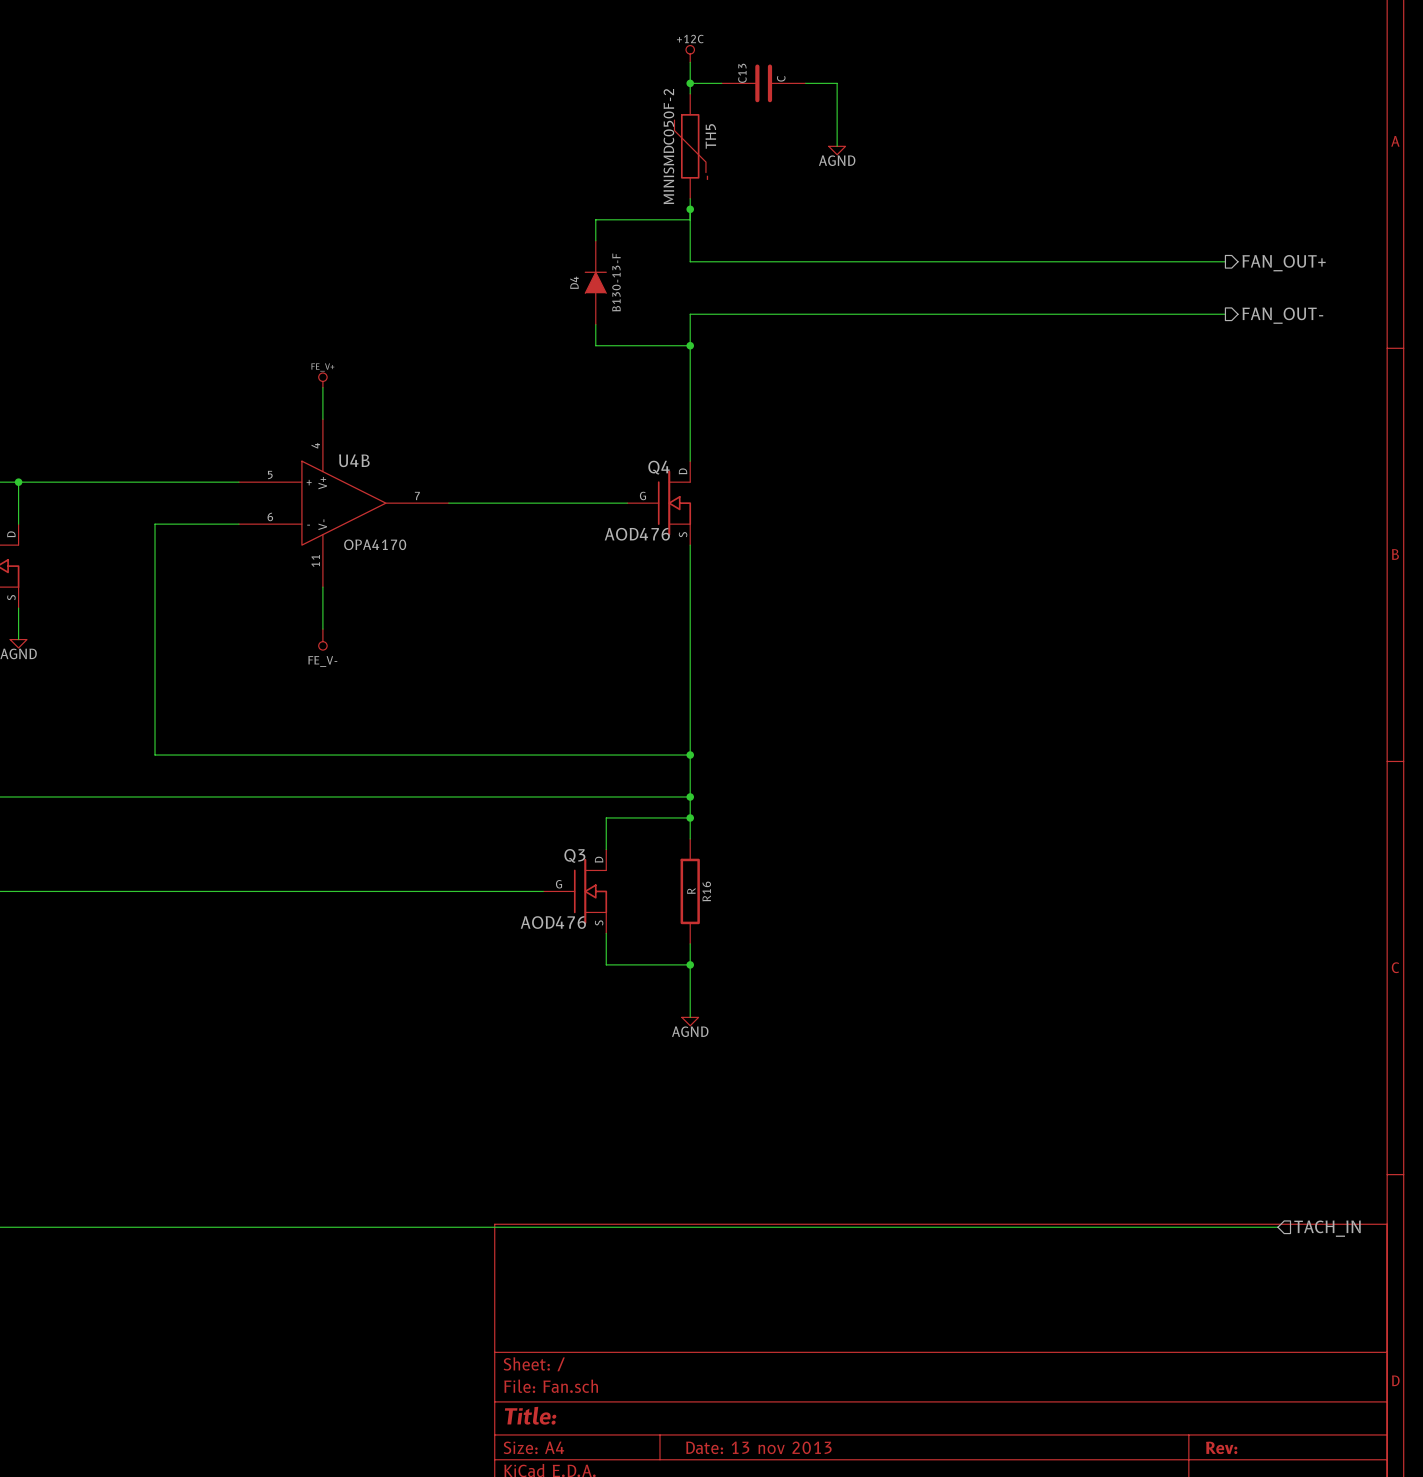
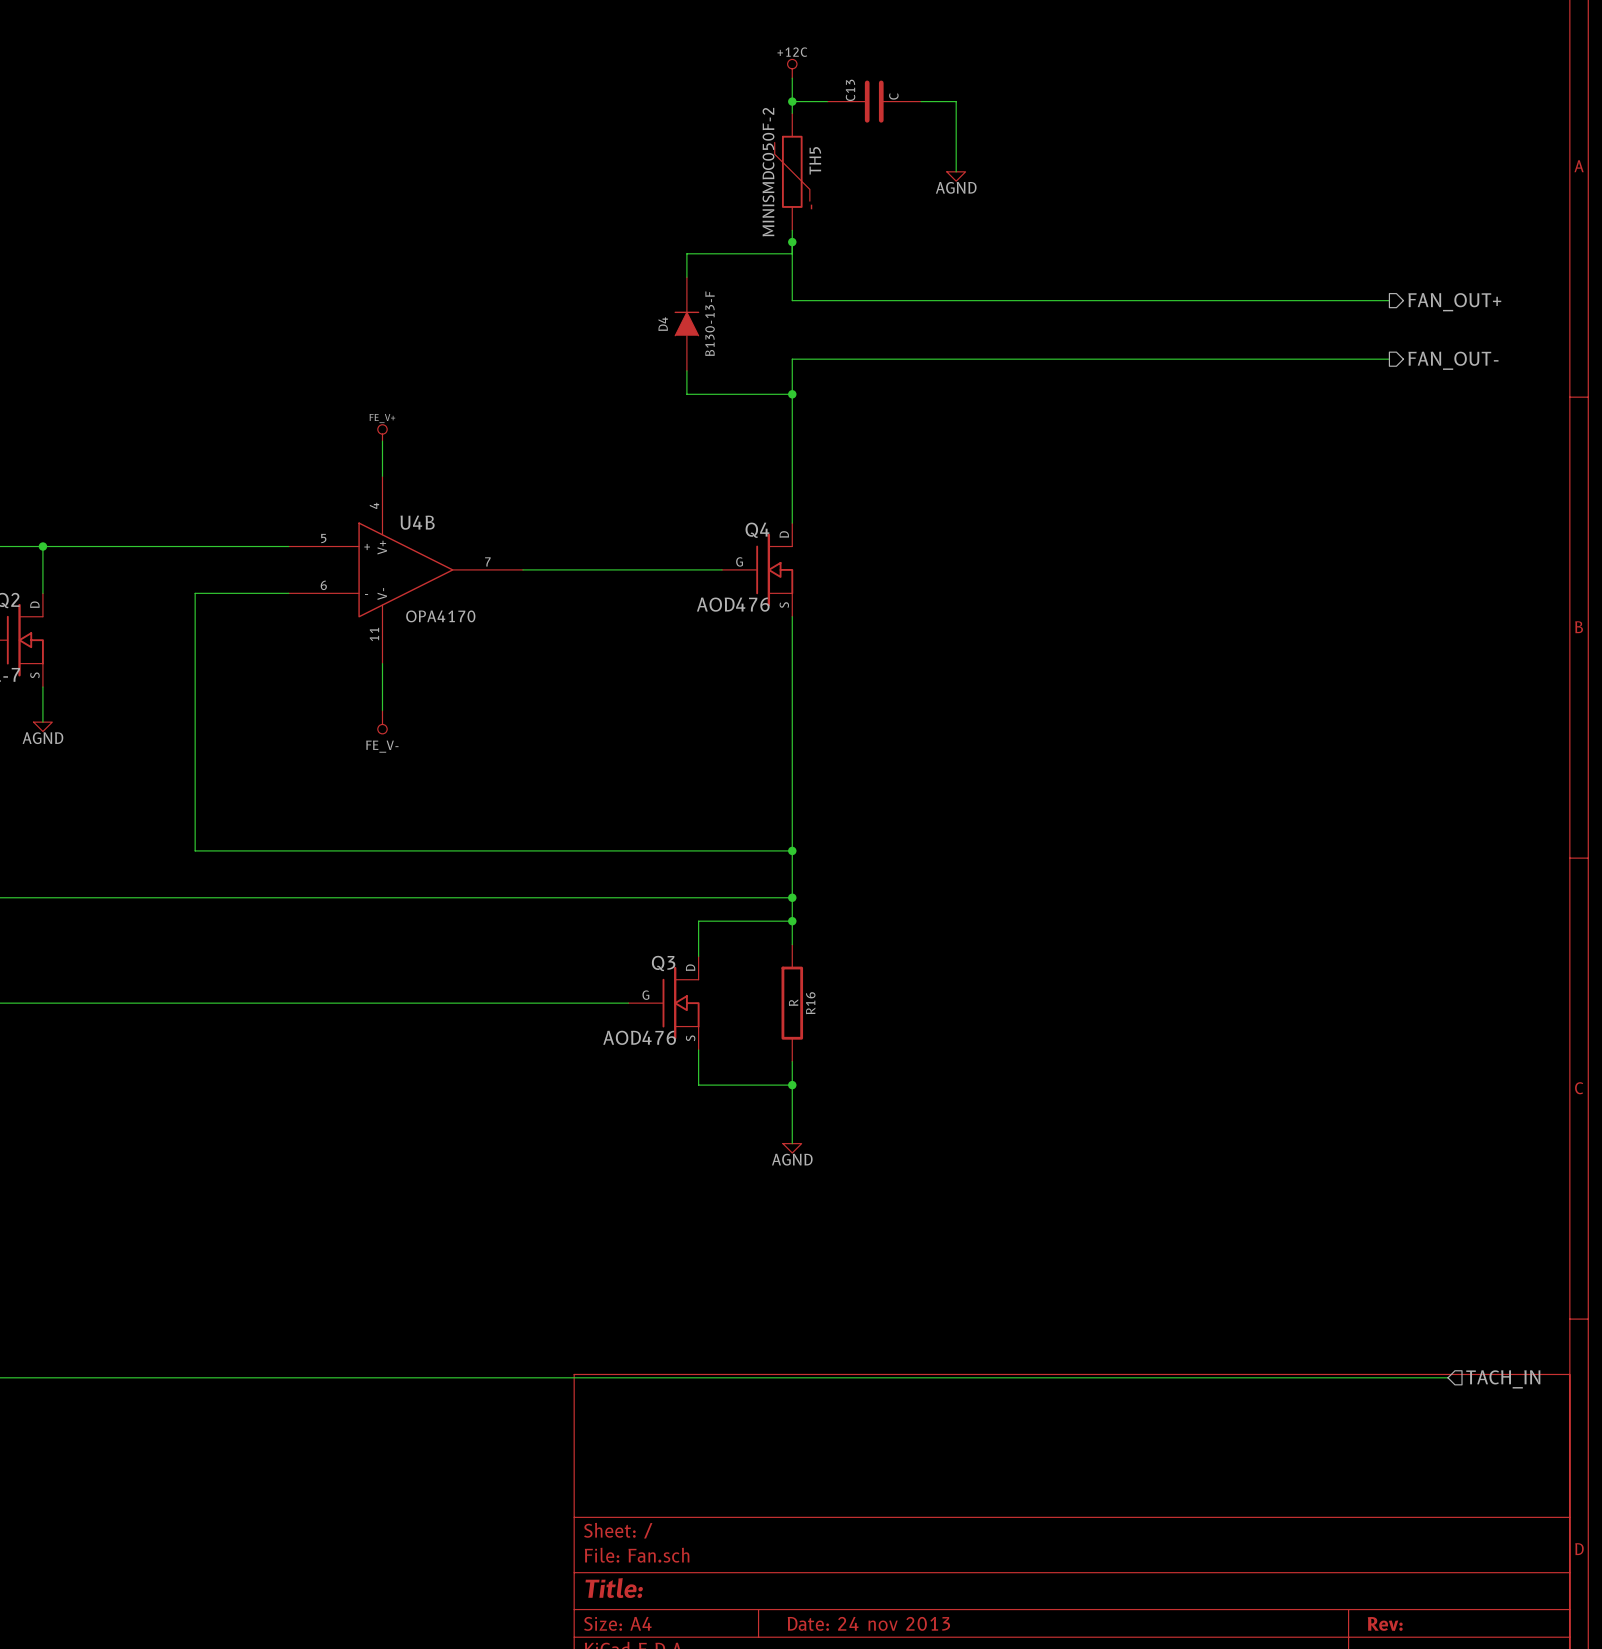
title block: Date: 13 nov 2013 (758, 1447) -> Date: 24 nov 2013 (868, 1623)

